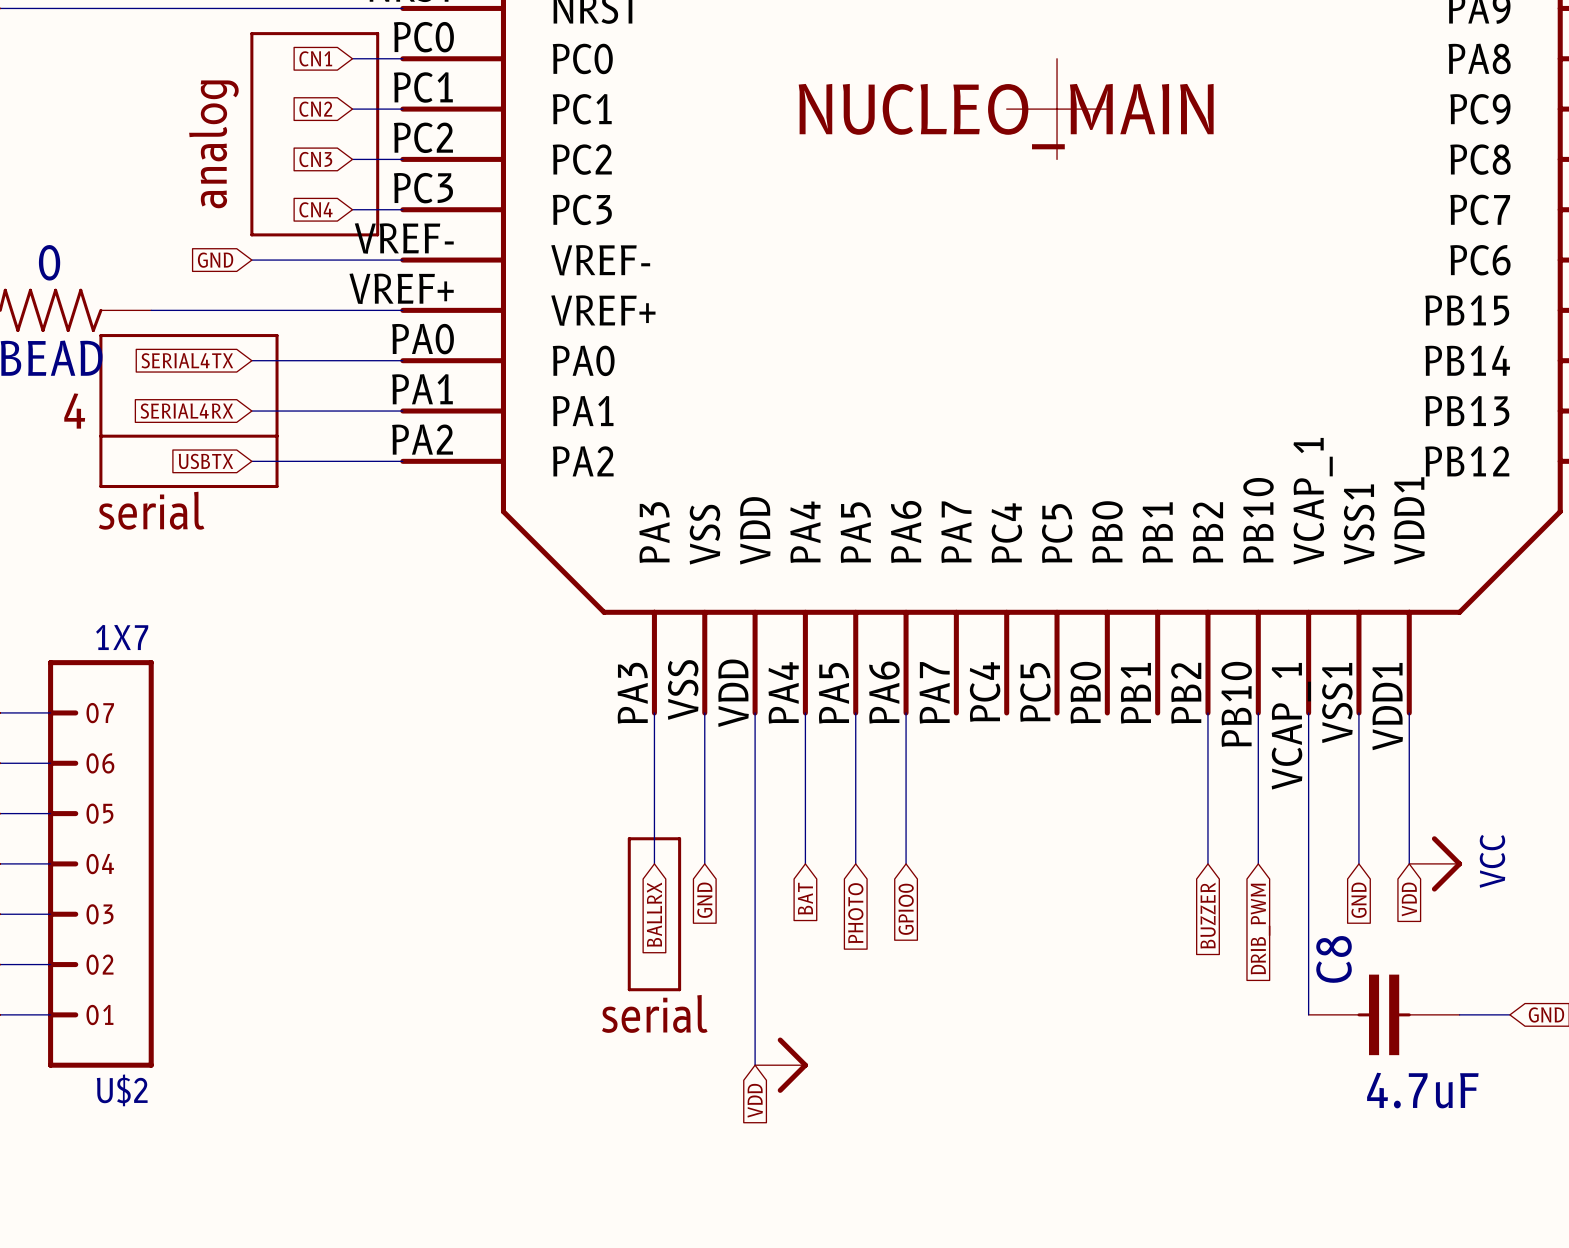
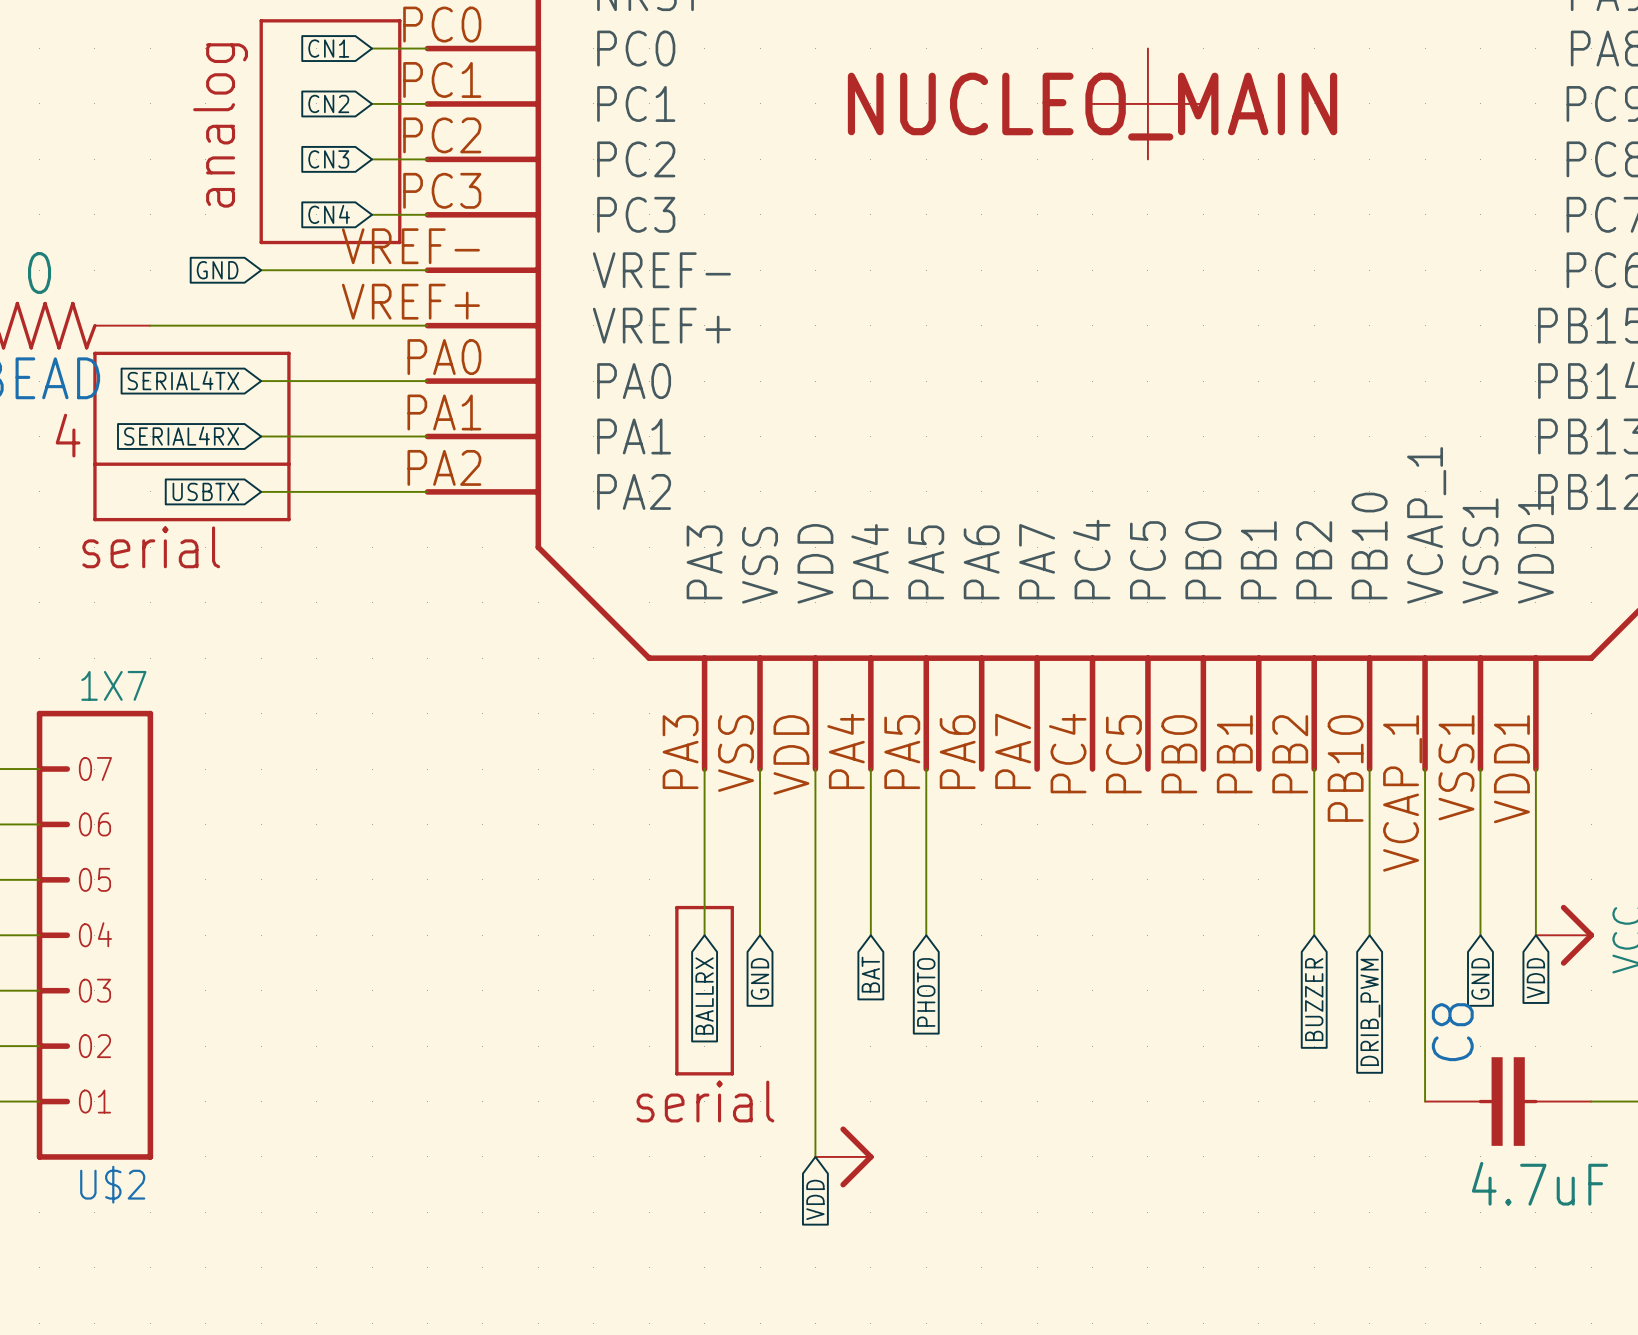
wire: (906, 712) (906, 863) -> none
global label: GPIO0 (906, 909) -> none

